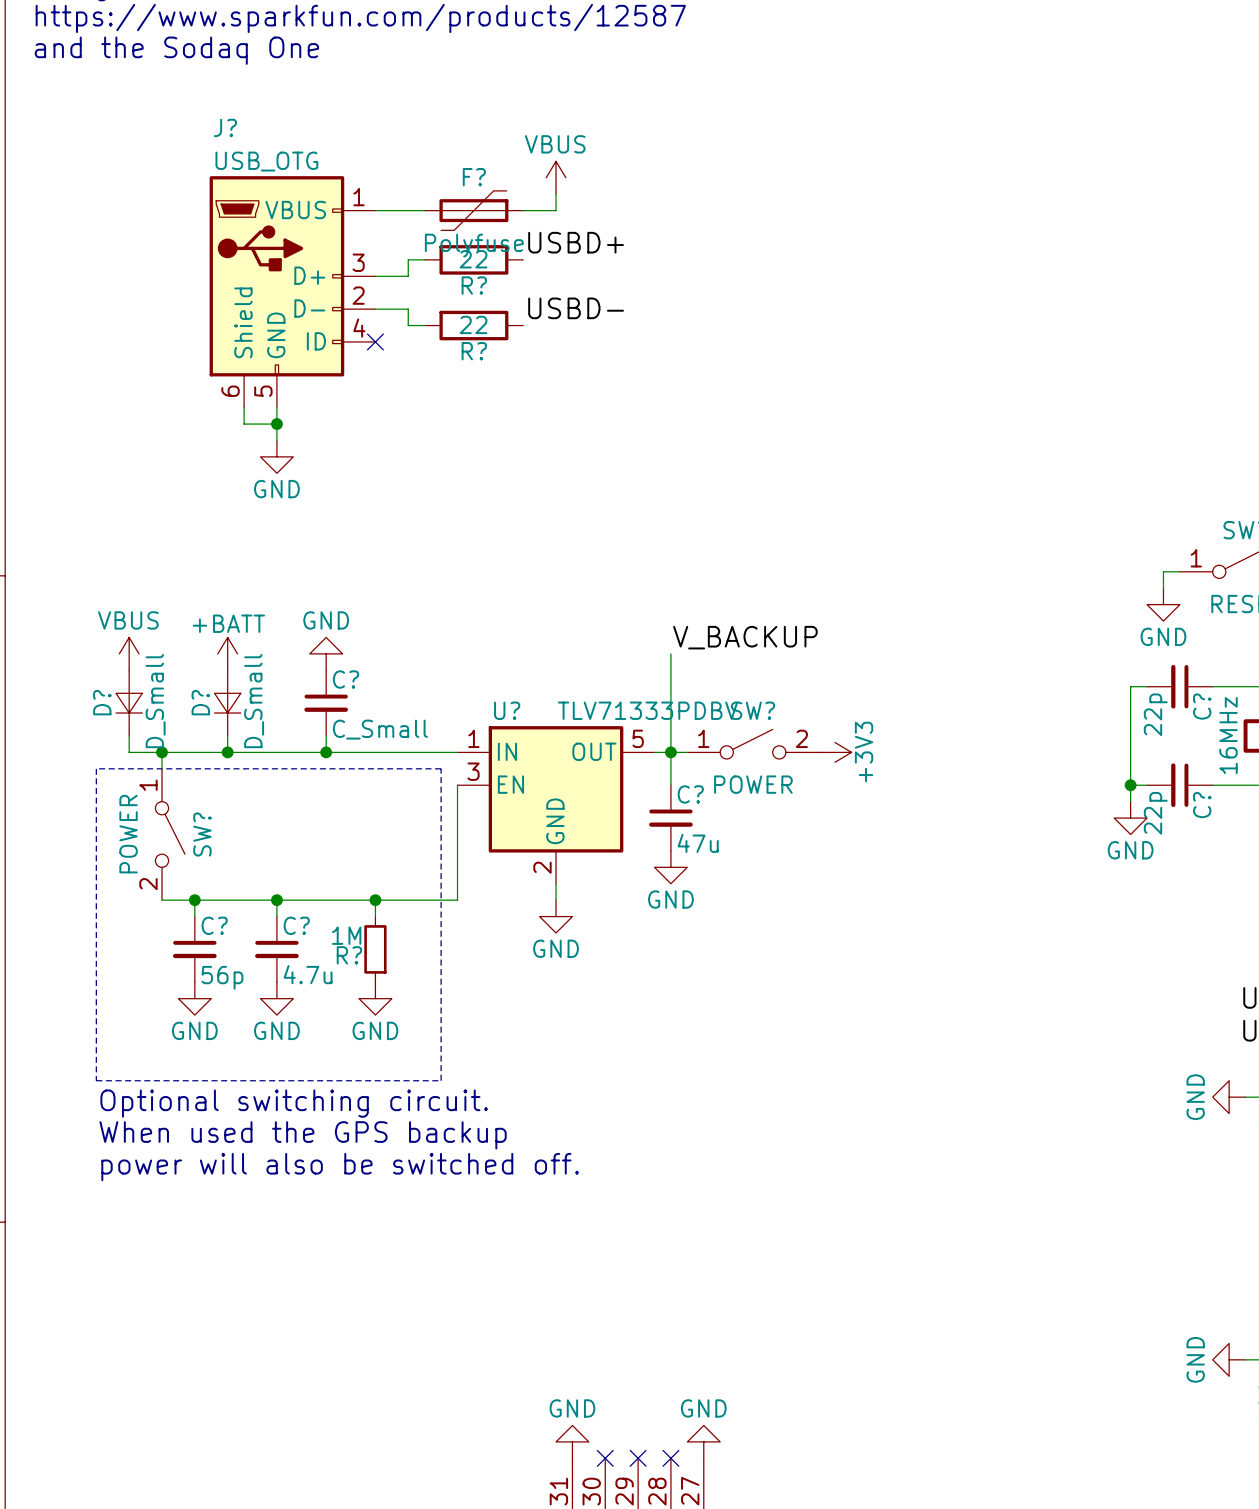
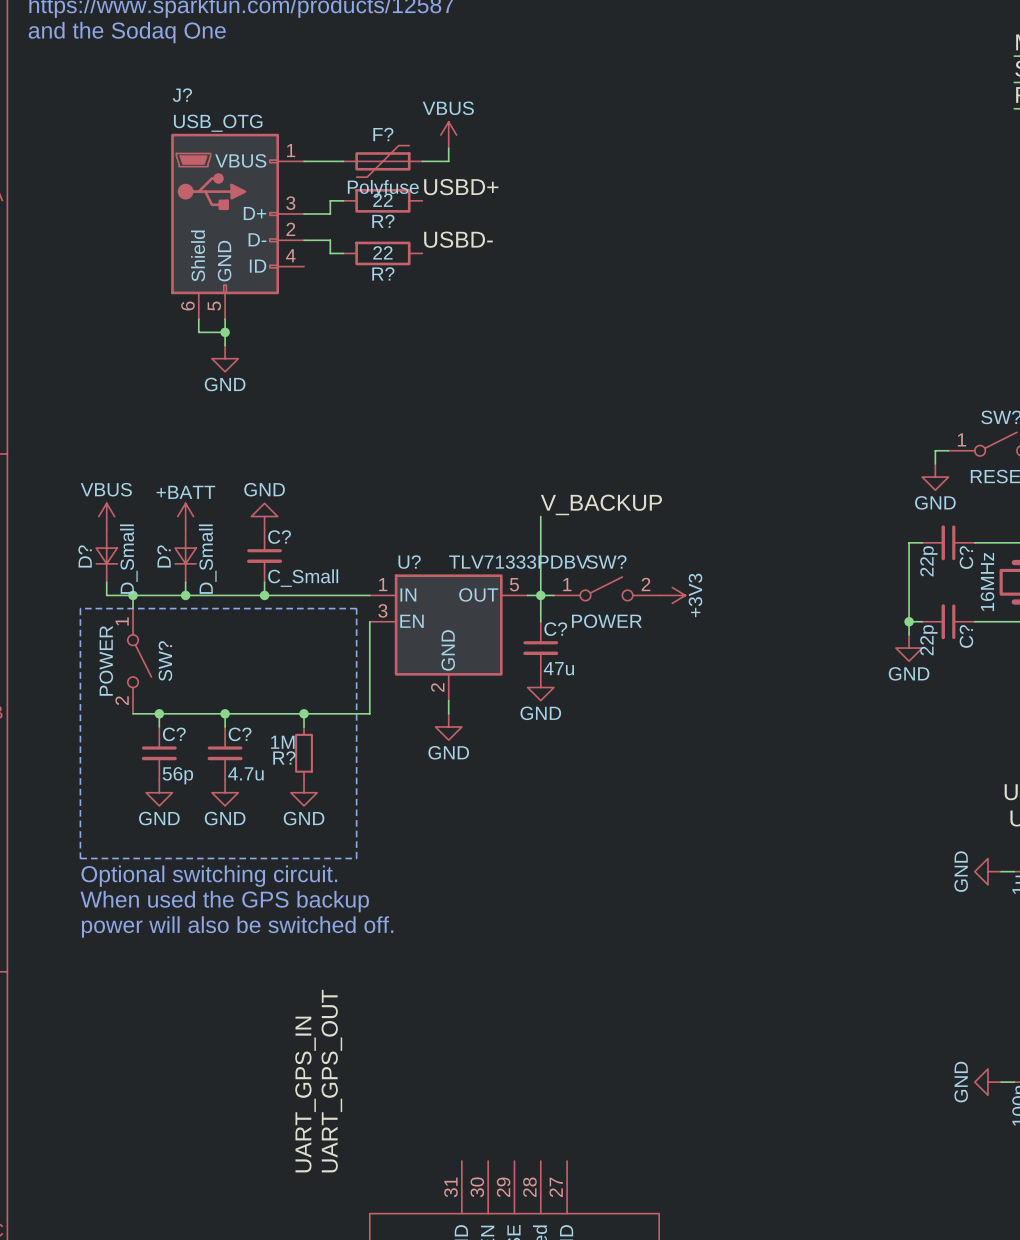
no-connect mark: (375, 341) -> none
label: none -> UART_GPS_OUT (331, 1081)
label: none -> UART_GPS_IN (305, 1094)
power symbol: GND (572, 1441) -> none
power symbol: GND (703, 1441) -> none
no-connect mark: (605, 1458) -> none
no-connect mark: (638, 1458) -> none
no-connect mark: (670, 1458) -> none

